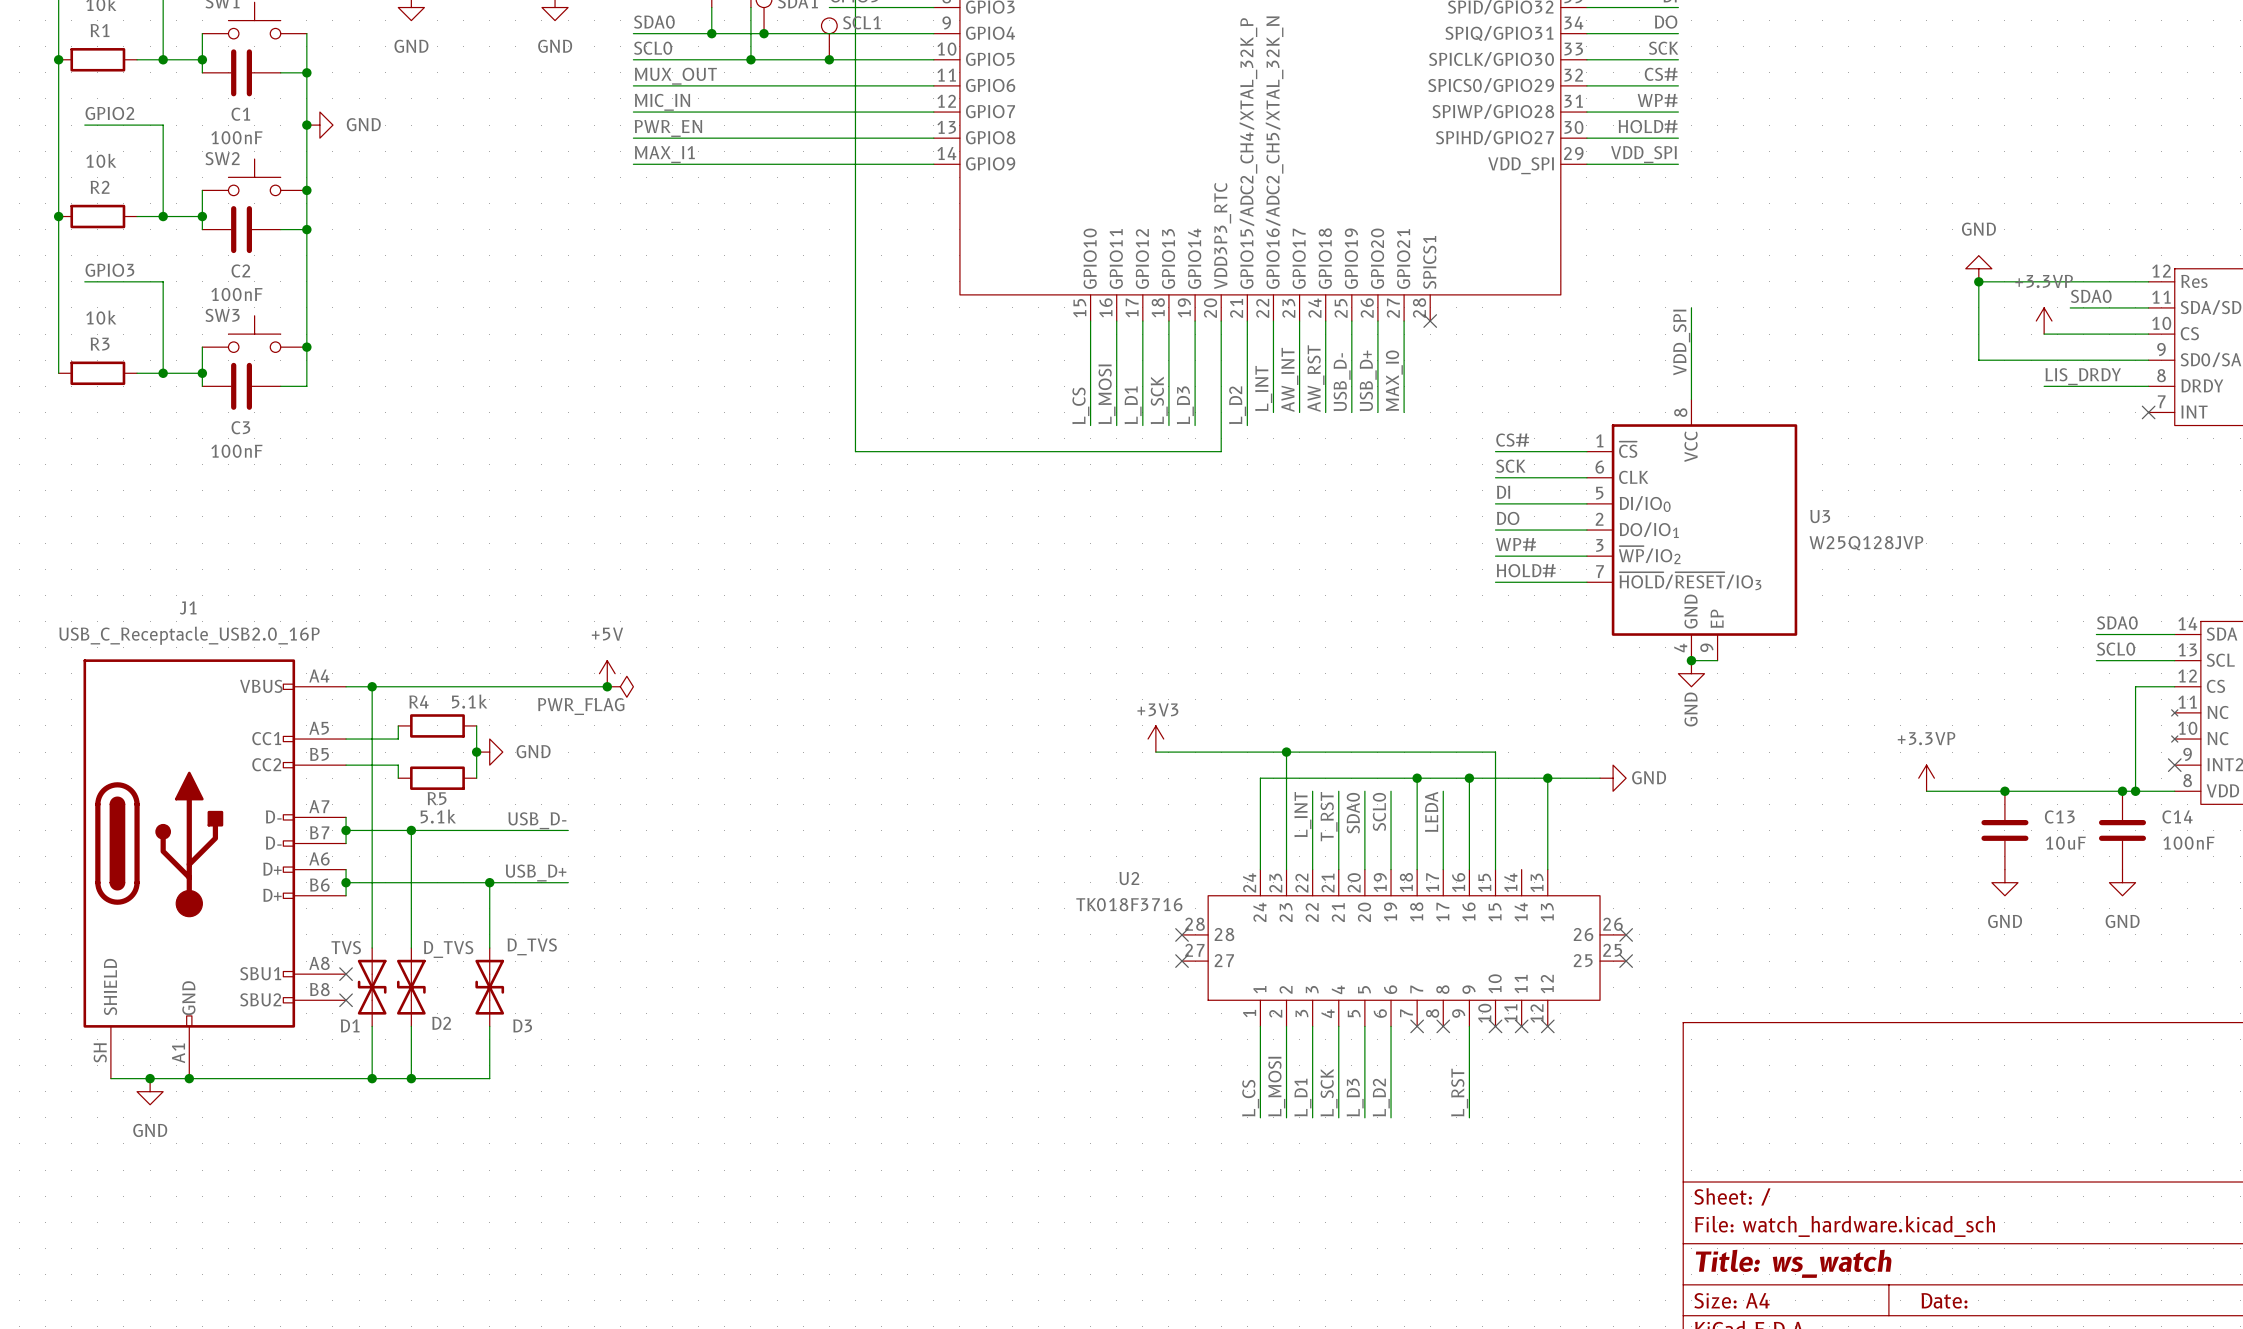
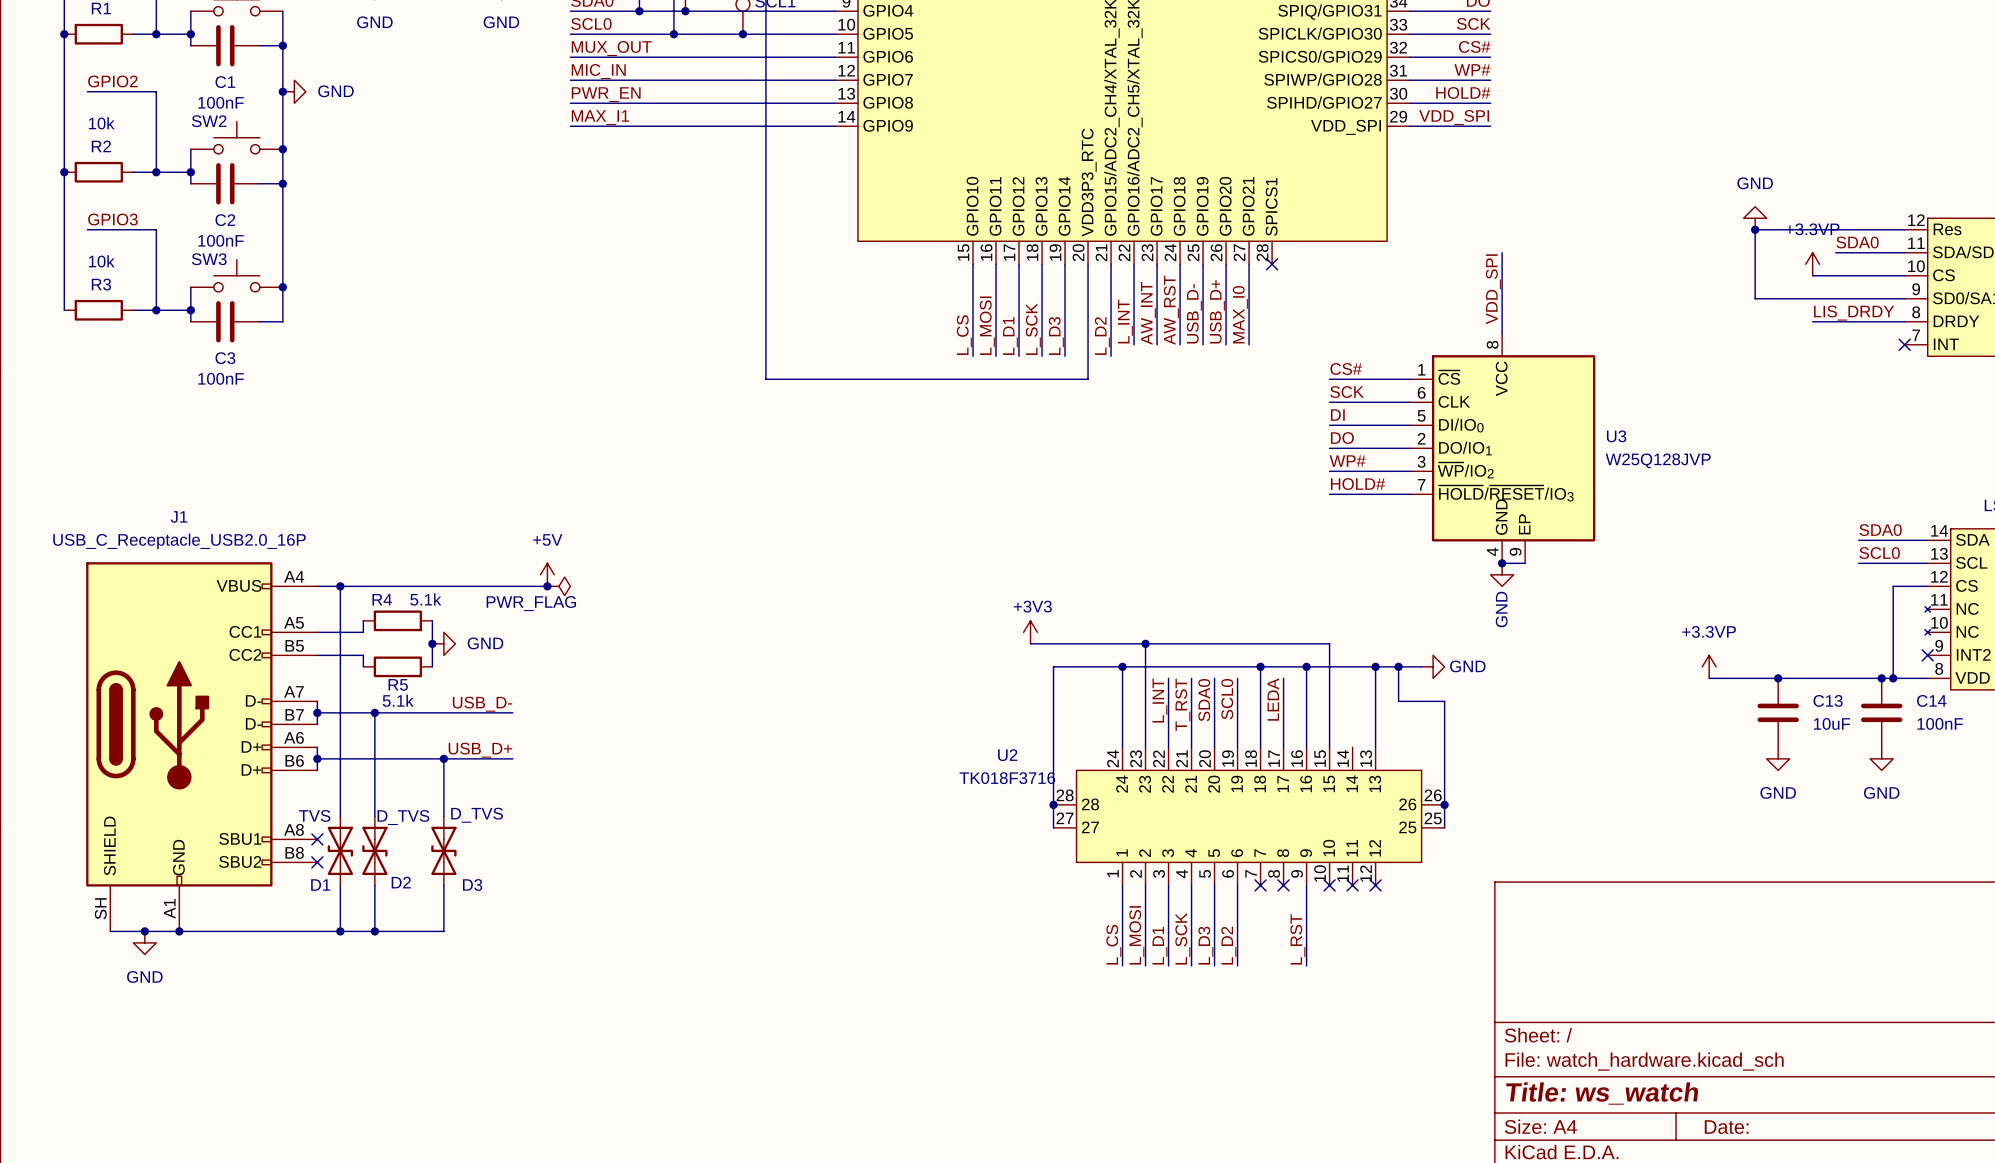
wire: none -> (1122, 666) (1053, 666) (1053, 827)
junction: none -> (1122, 666)
wire: none -> (1398, 666) (1398, 701) (1444, 701) (1444, 827)
junction: none -> (1398, 666)
no-connect mark: (1182, 934) -> none
junction: none -> (1053, 804)
no-connect mark: (1626, 934) -> none
junction: none -> (1444, 804)
no-connect mark: (1182, 961) -> none
no-connect mark: (1626, 961) -> none

